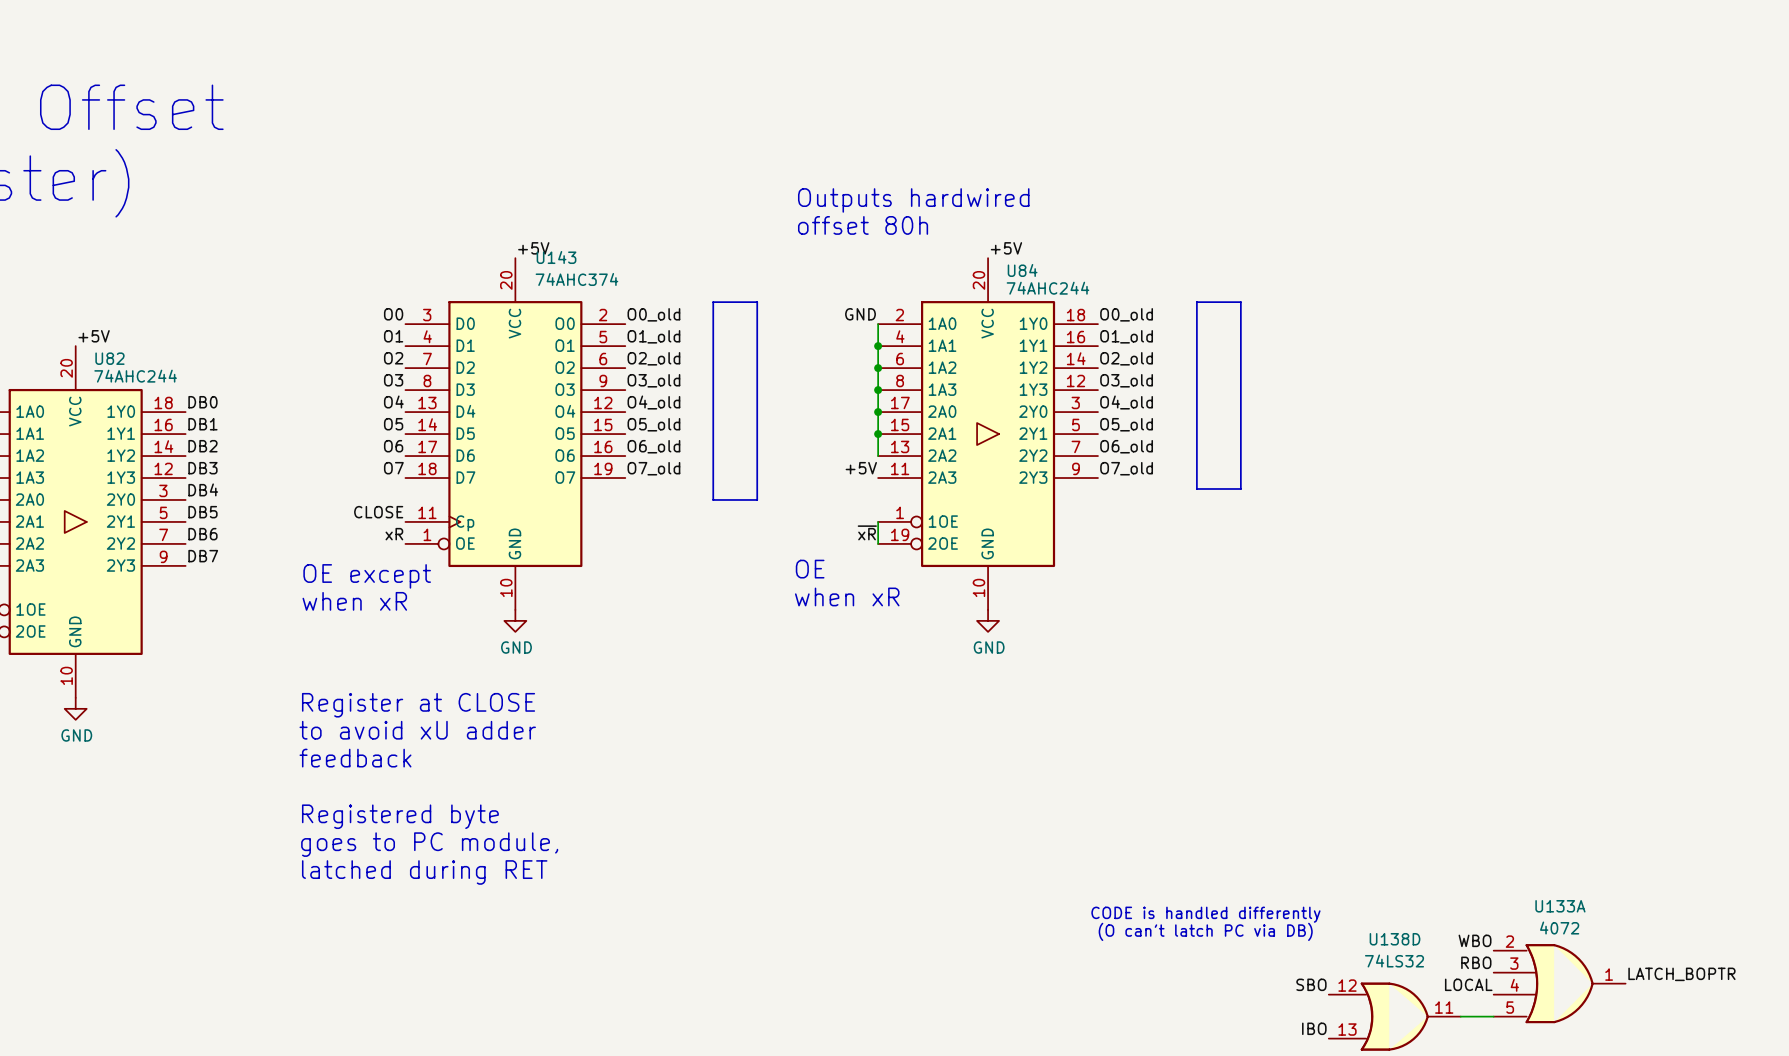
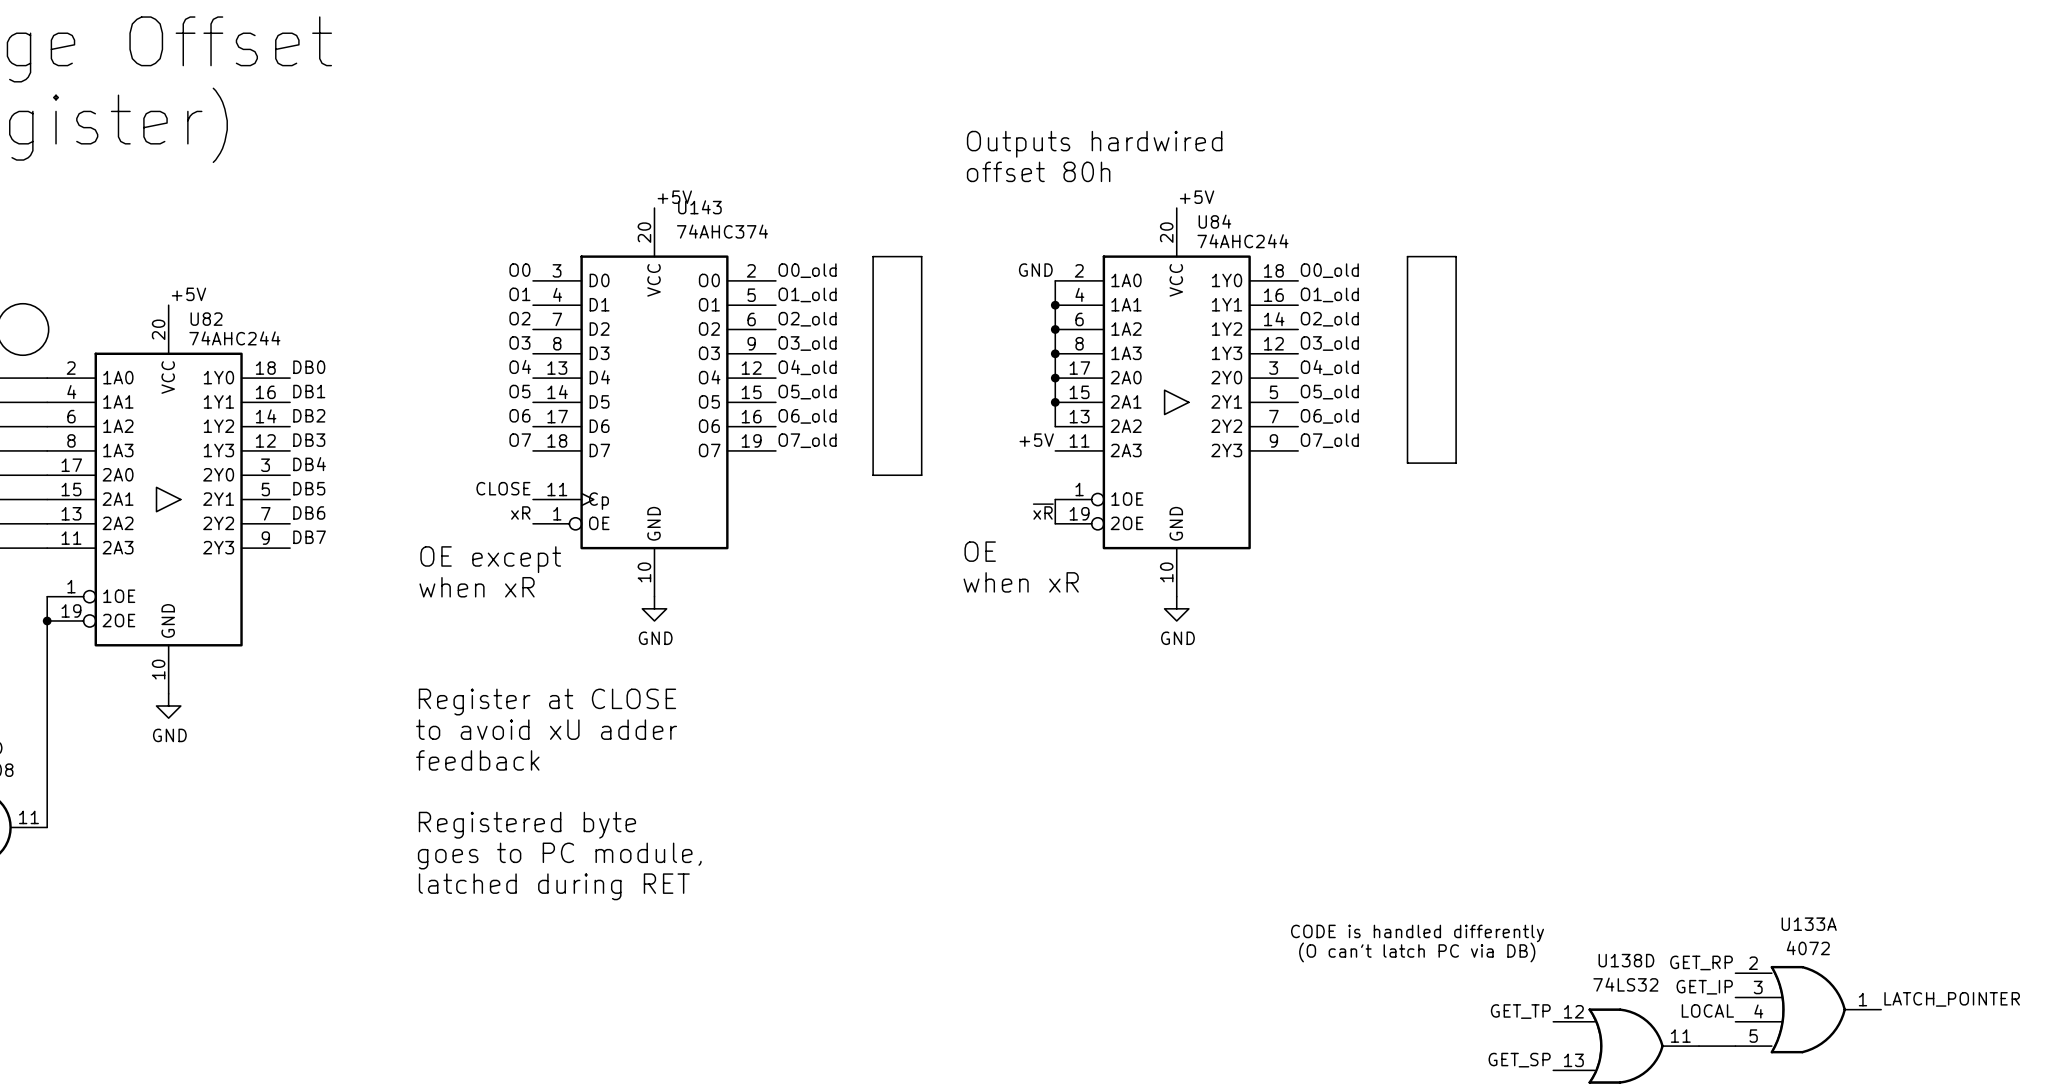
label: WBO (1475, 940) -> GET_RP (1701, 962)
label: RBO (1476, 962) -> GET_IP (1704, 987)
label: LATCH_BOPTR (1681, 974) -> LATCH_POINTER (1952, 999)
label: SBO (1311, 984) -> GET_TP (1520, 1011)
label: IBO (1314, 1028) -> GET_SP (1519, 1060)

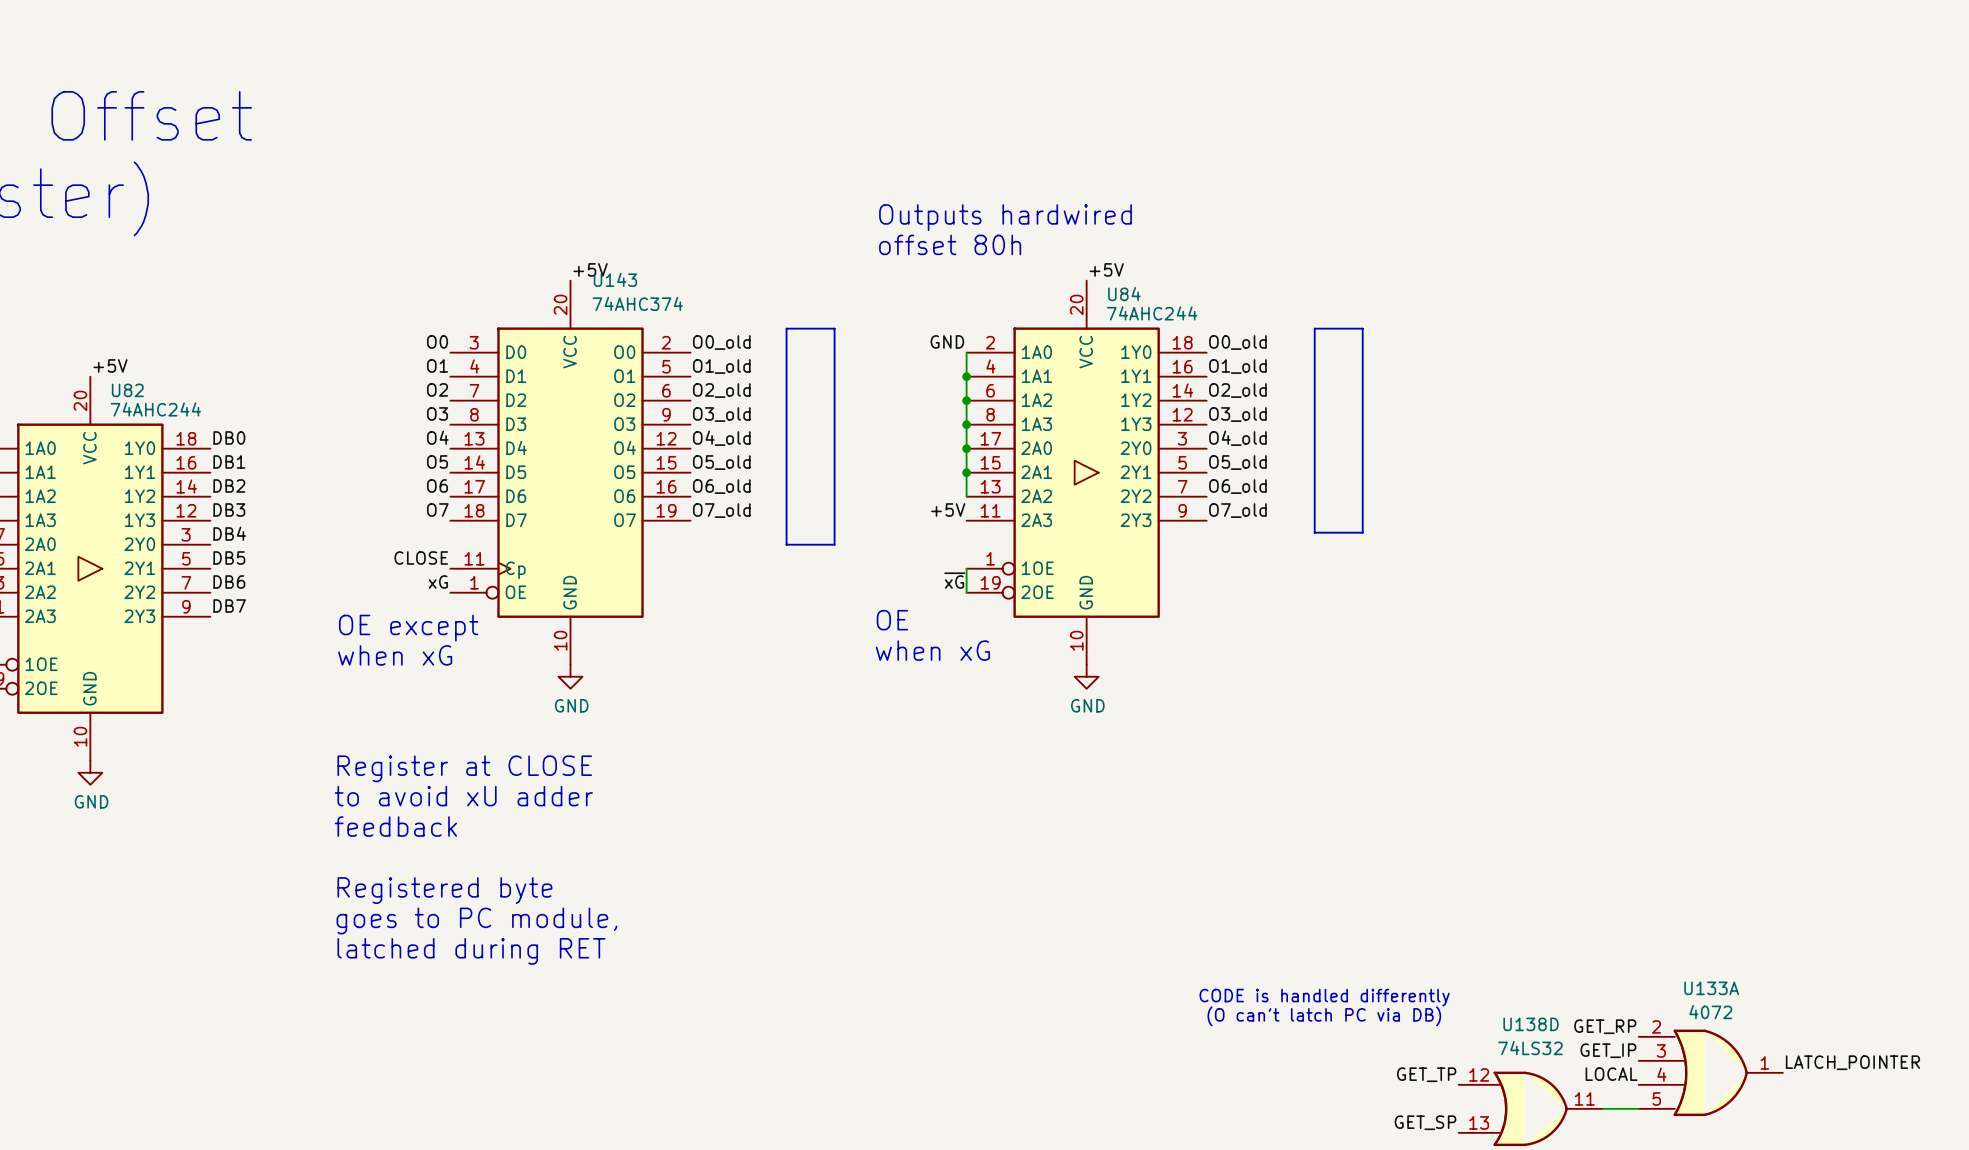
label: ~{xR} (1043, 511) -> ~{xG} (954, 580)
label: xR (520, 512) -> xG (438, 582)
text: when xR (1021, 582) -> when xG (932, 650)
text: when xR (477, 587) -> when xG (395, 655)

